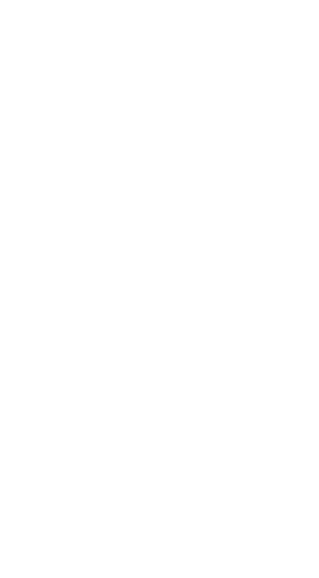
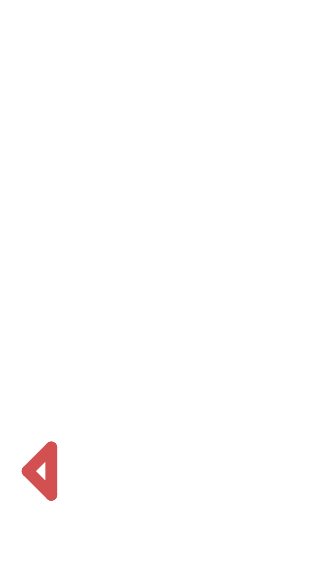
track: none -> (51, 447) (51, 494) (27, 471) (51, 447)

